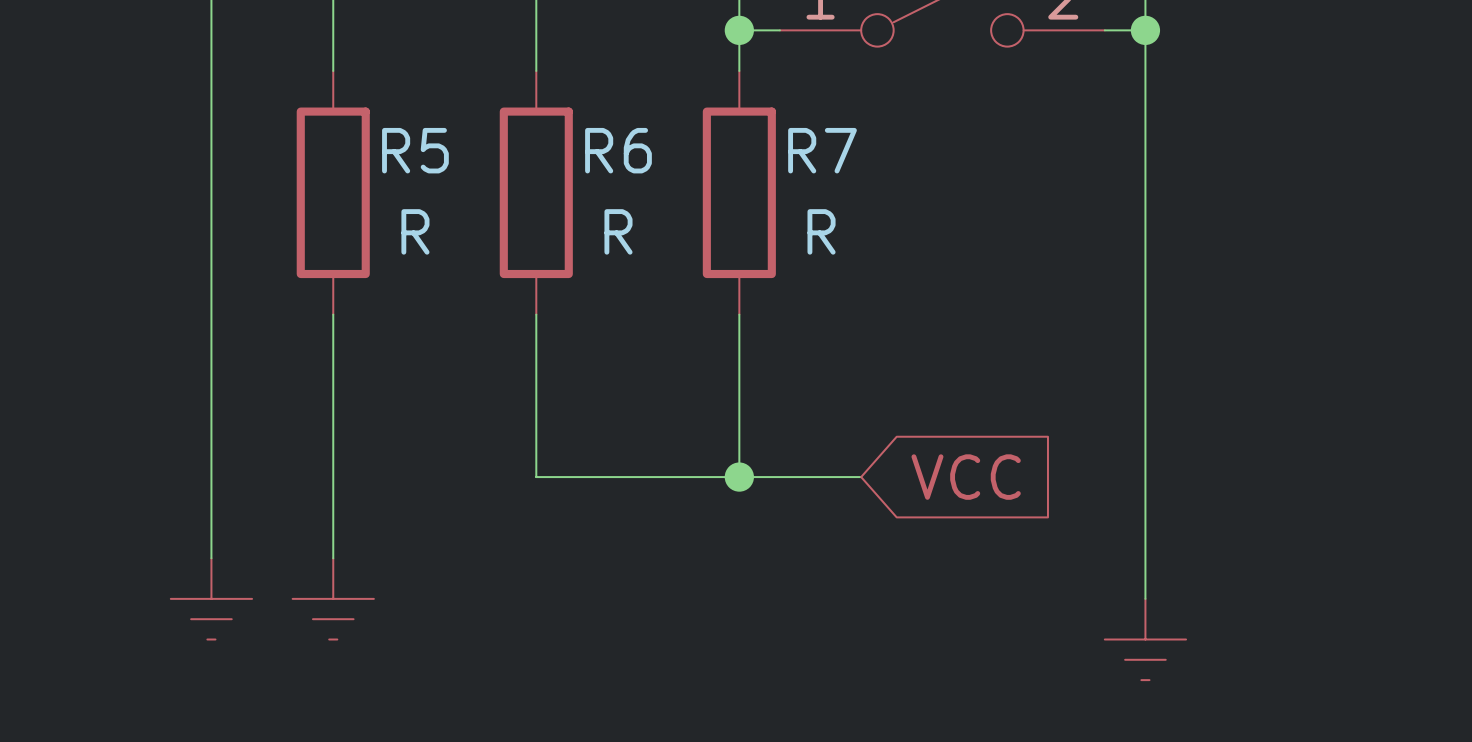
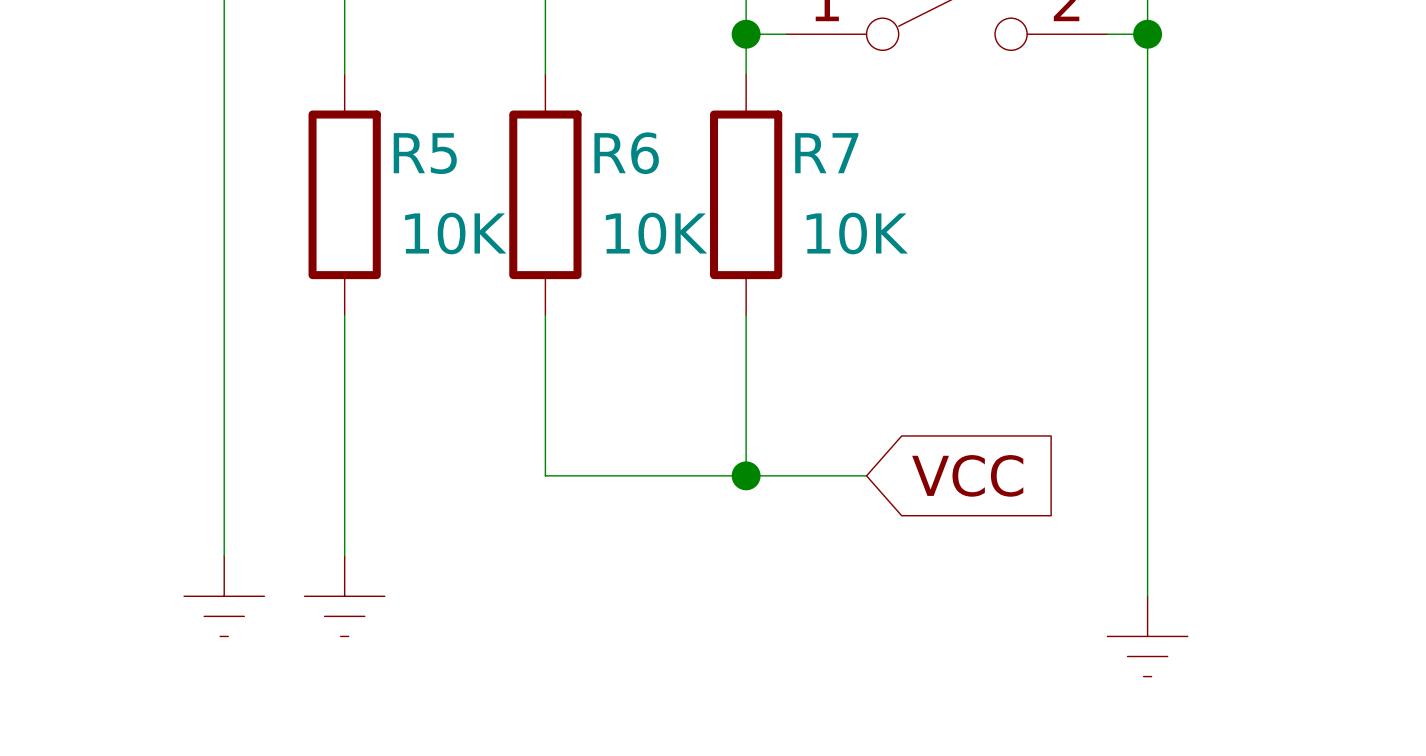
R5 value: R (415, 231) -> 10K (455, 233)
R6 value: R (618, 231) -> 10K (656, 233)
R7 value: R (821, 231) -> 10K (857, 233)

